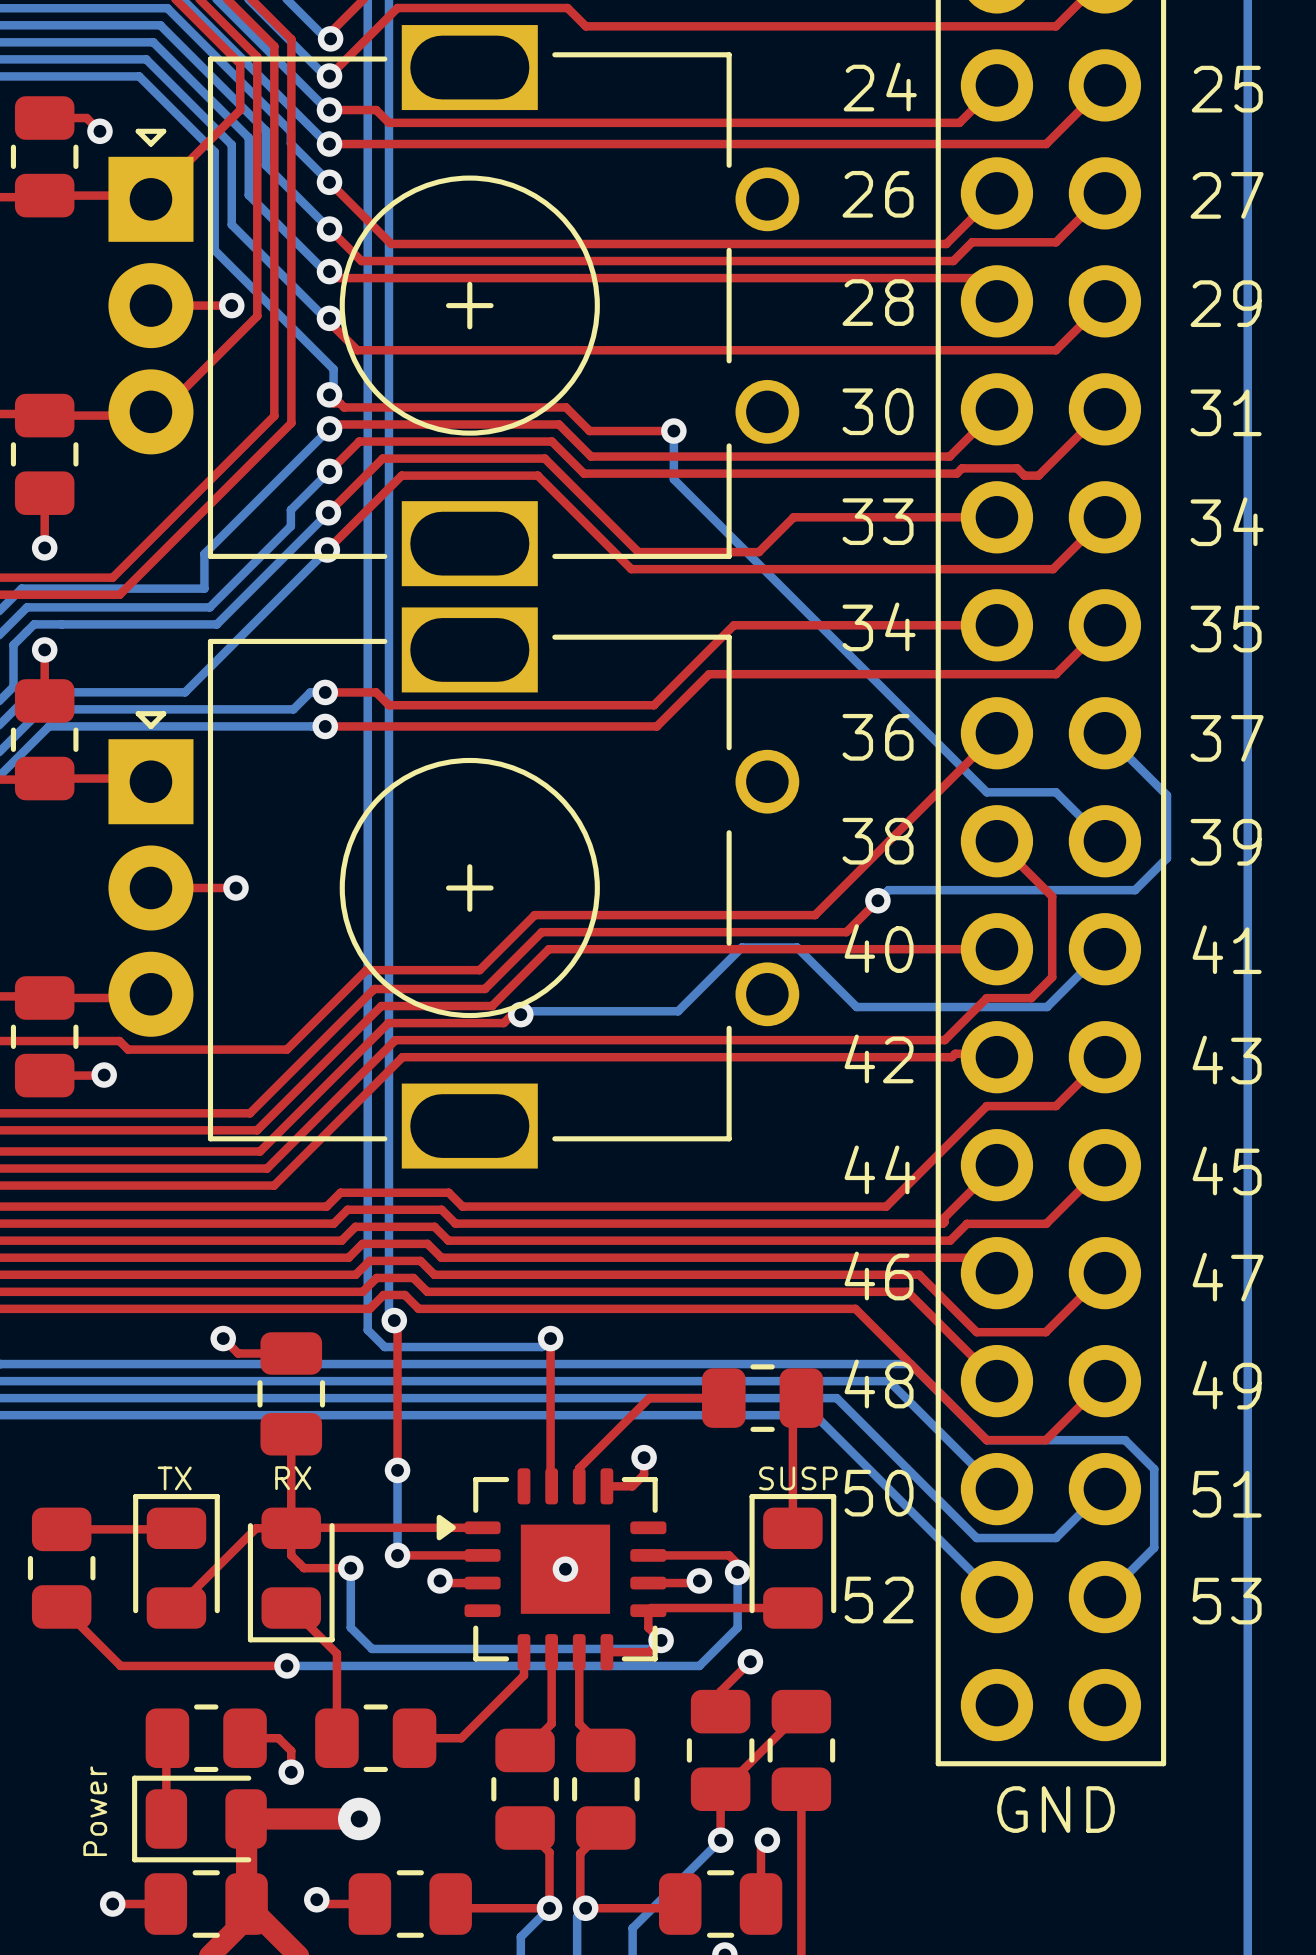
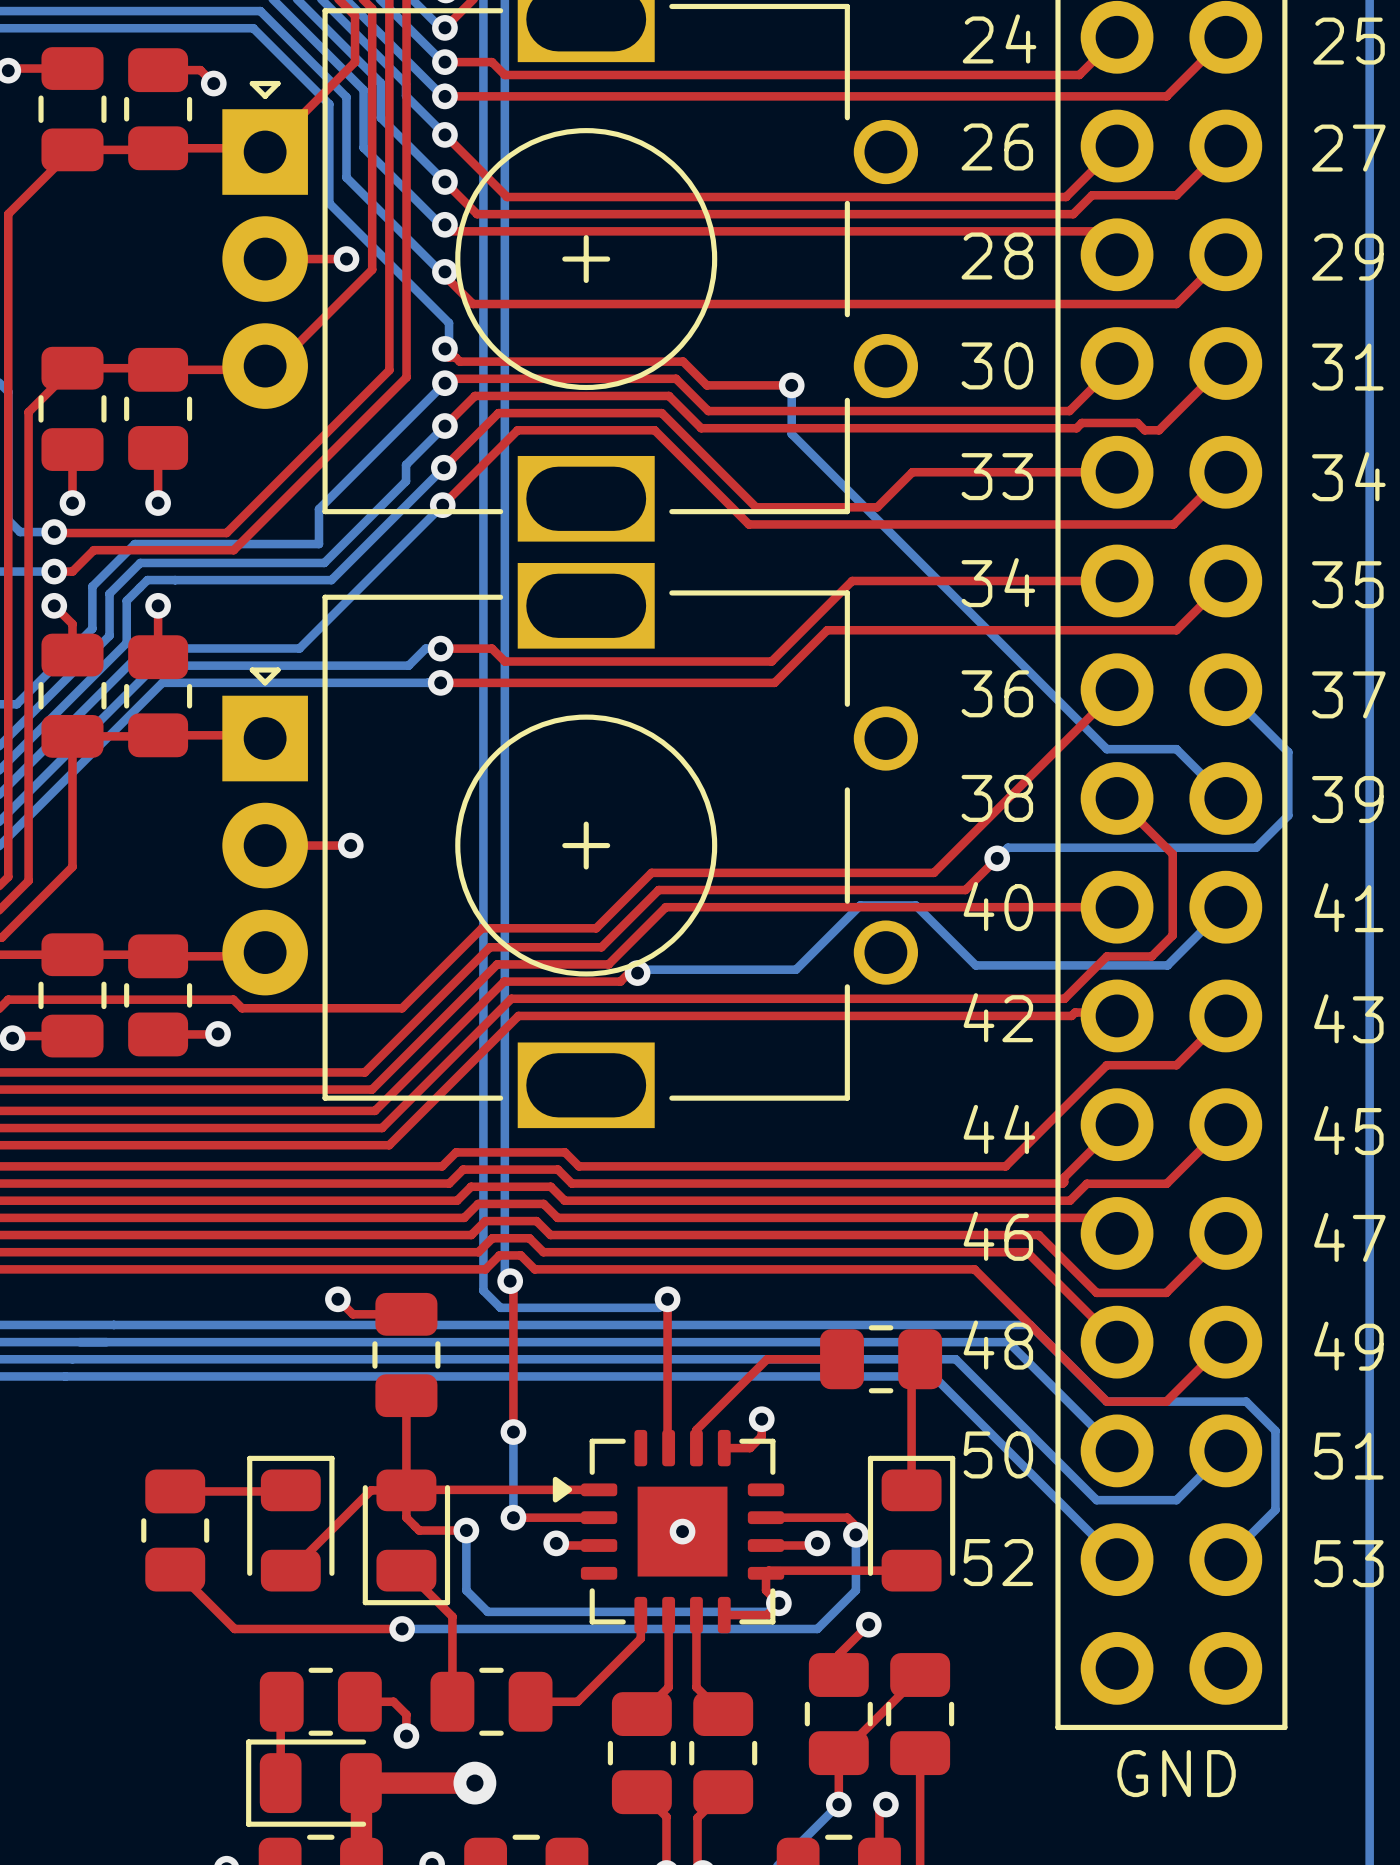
text: TX (174, 1478) -> none
text: RX (293, 1478) -> none
text: SUSP (798, 1478) -> none
text: Power (95, 1811) -> none

